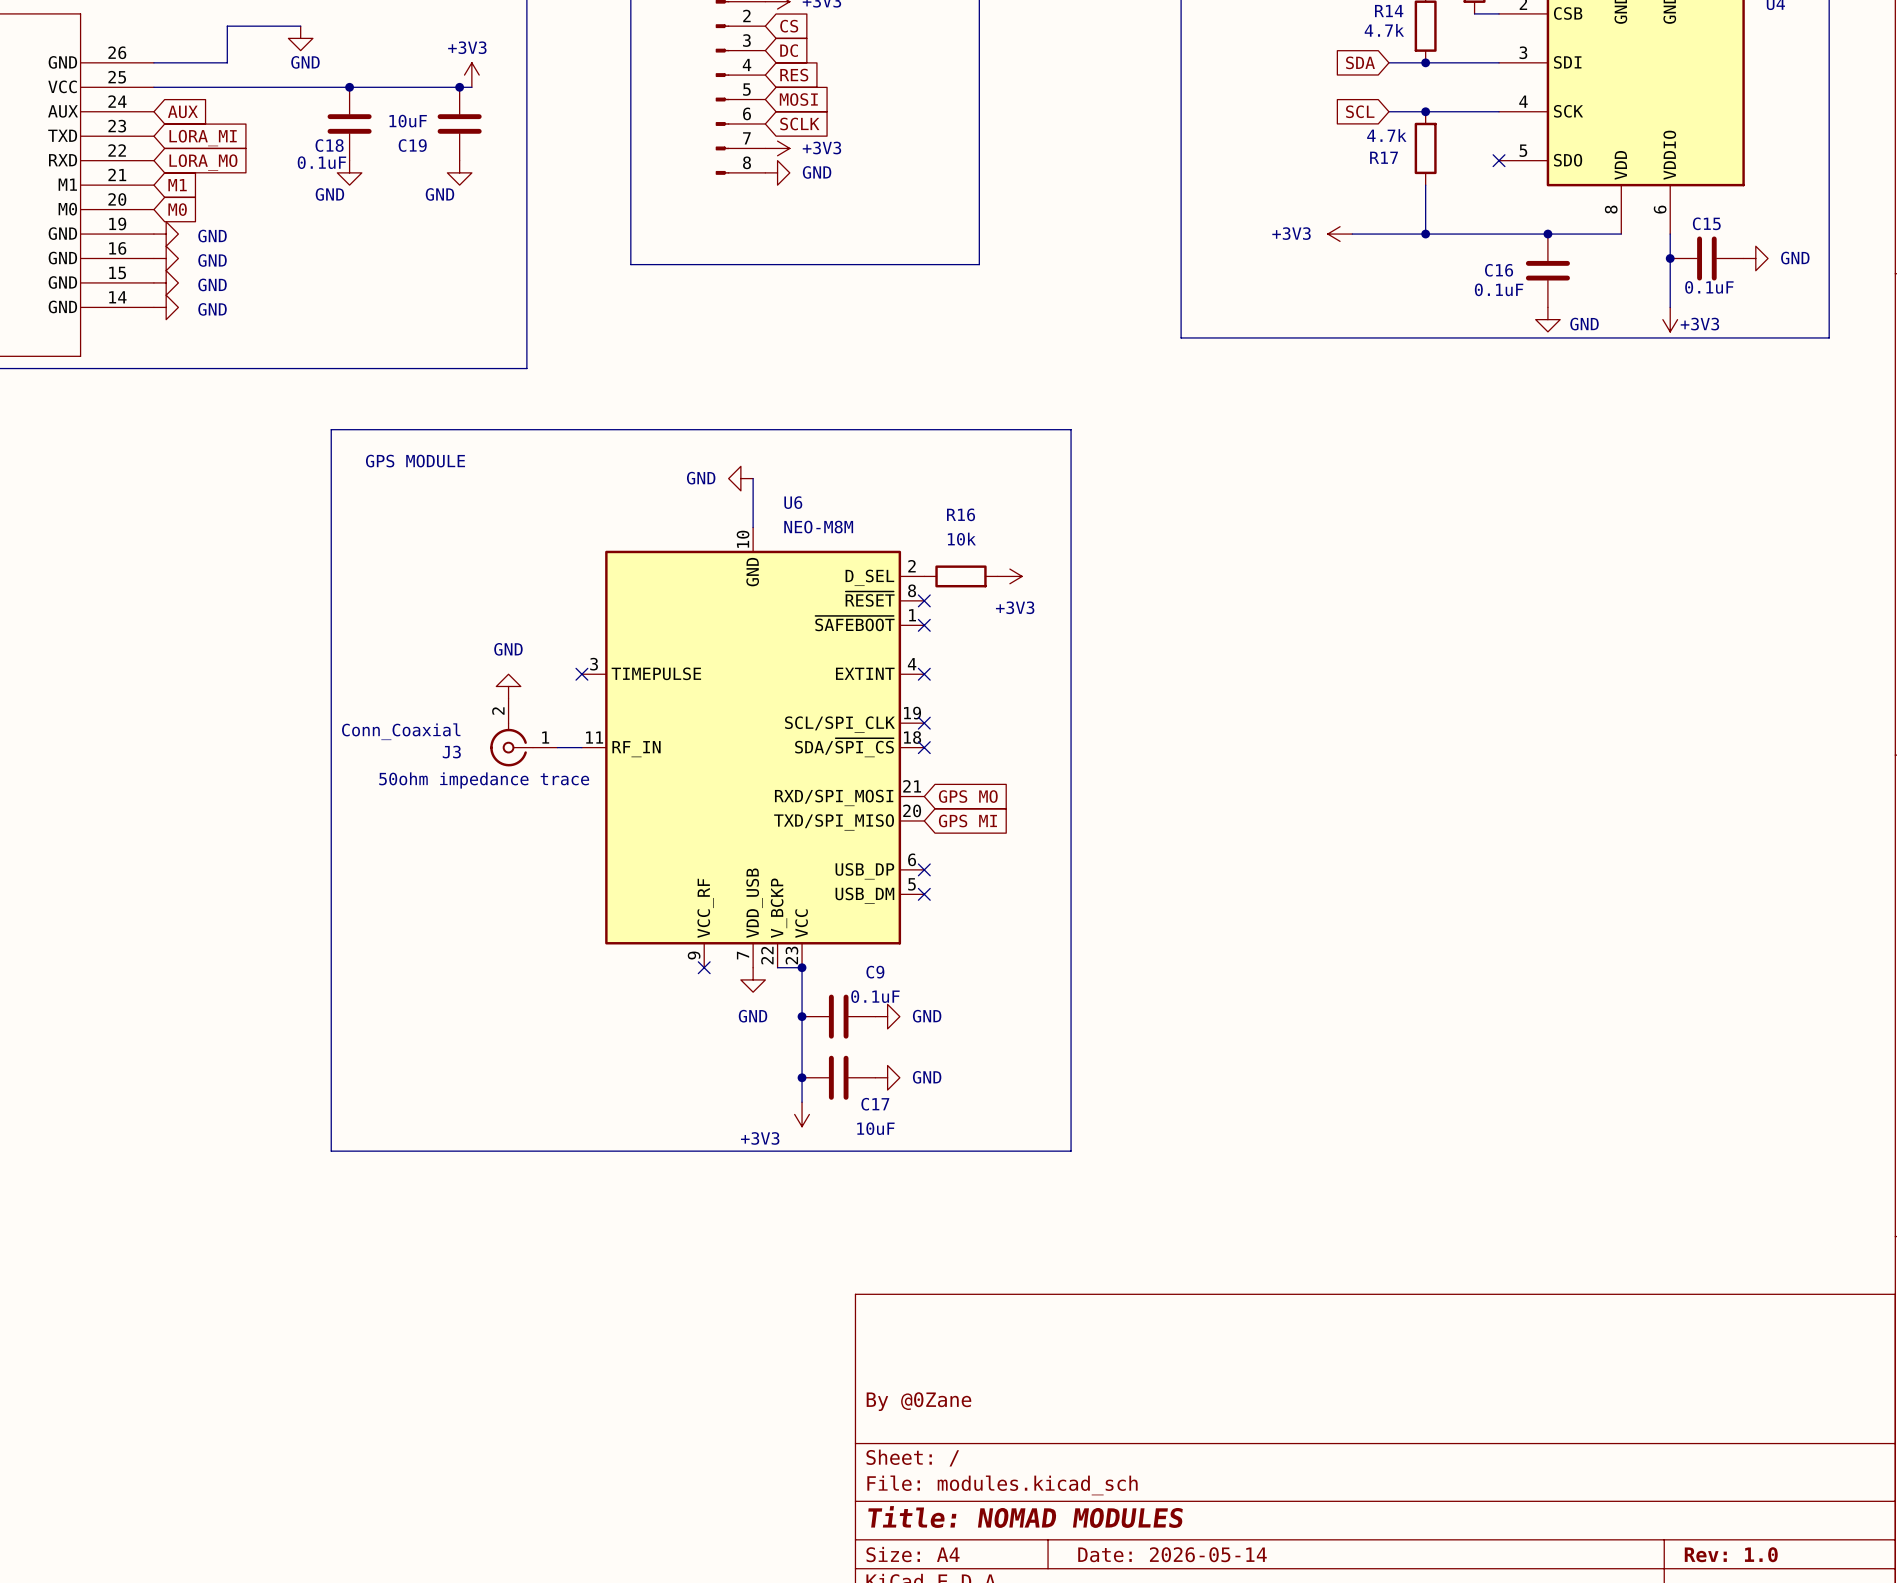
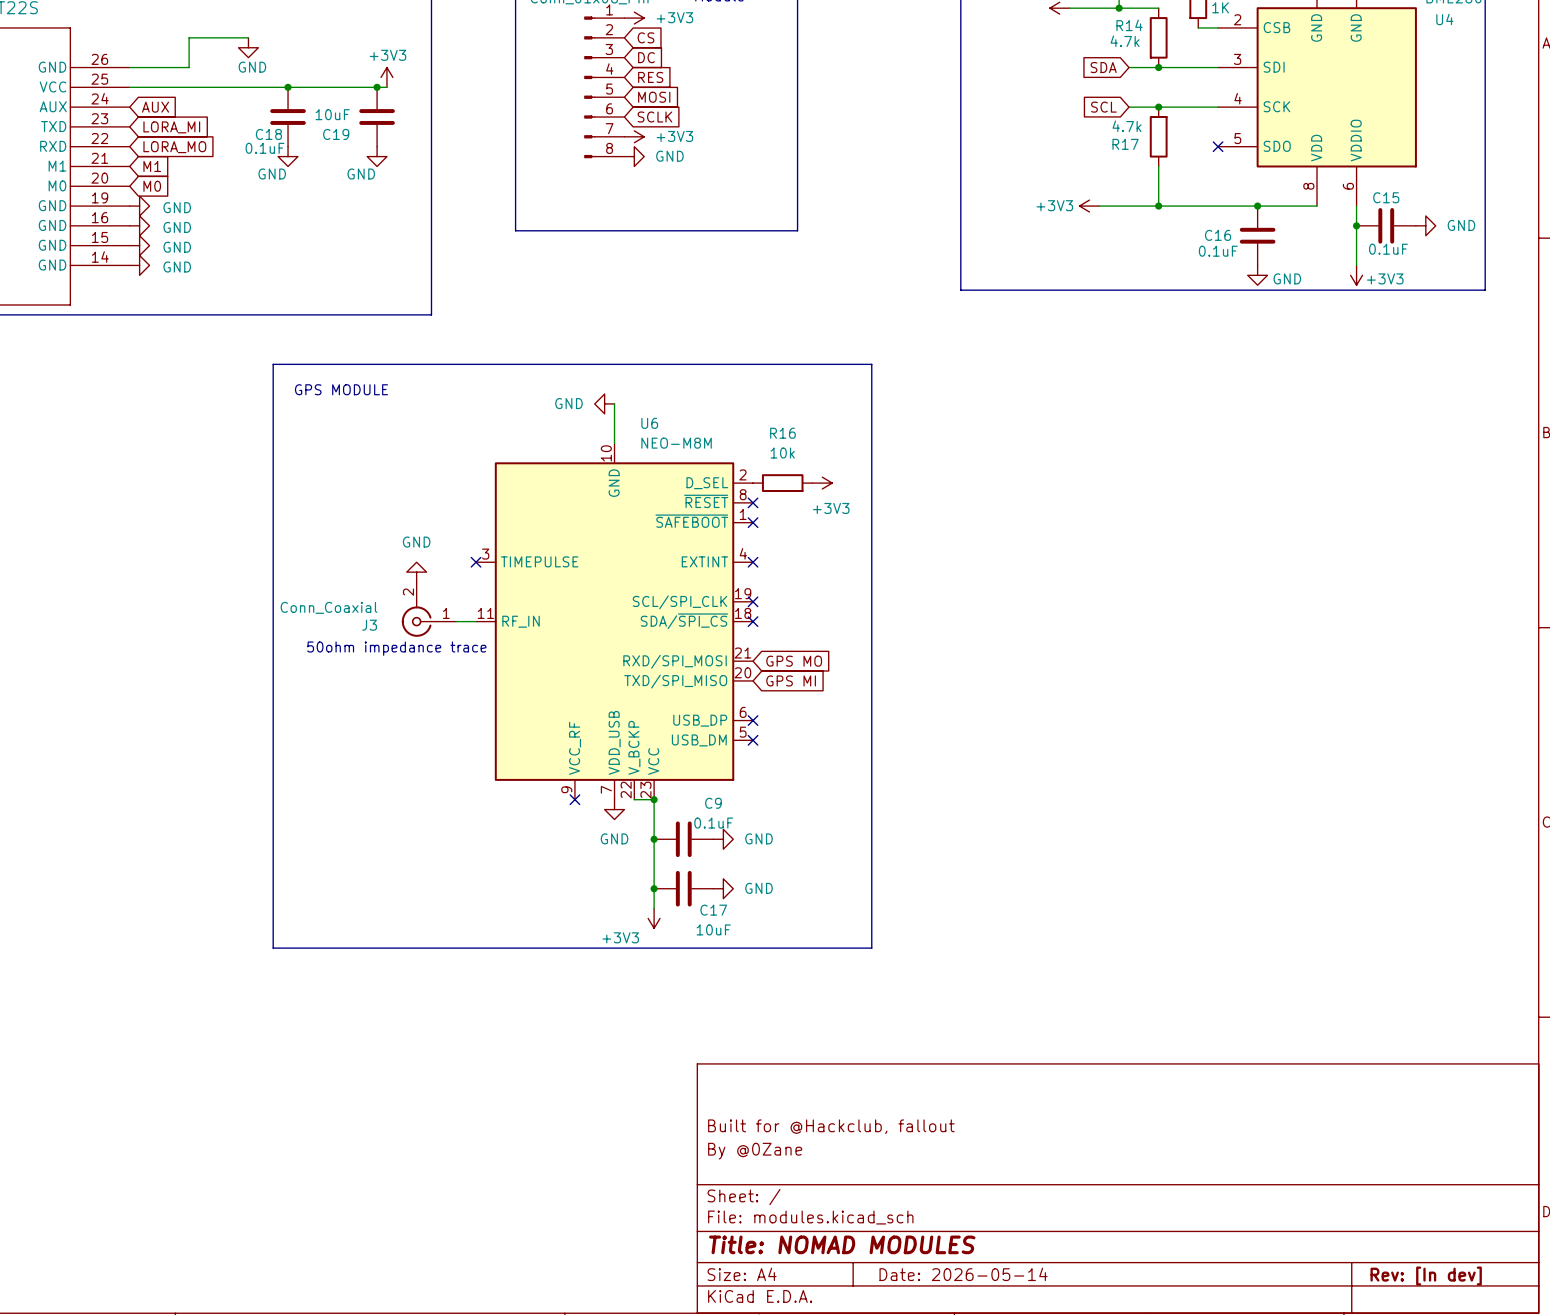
title block: none -> Built for @Hackclub, fallout (831, 1126)
title block: Rev: 1.0 (1731, 1554) -> Rev: [In dev] (1426, 1276)

